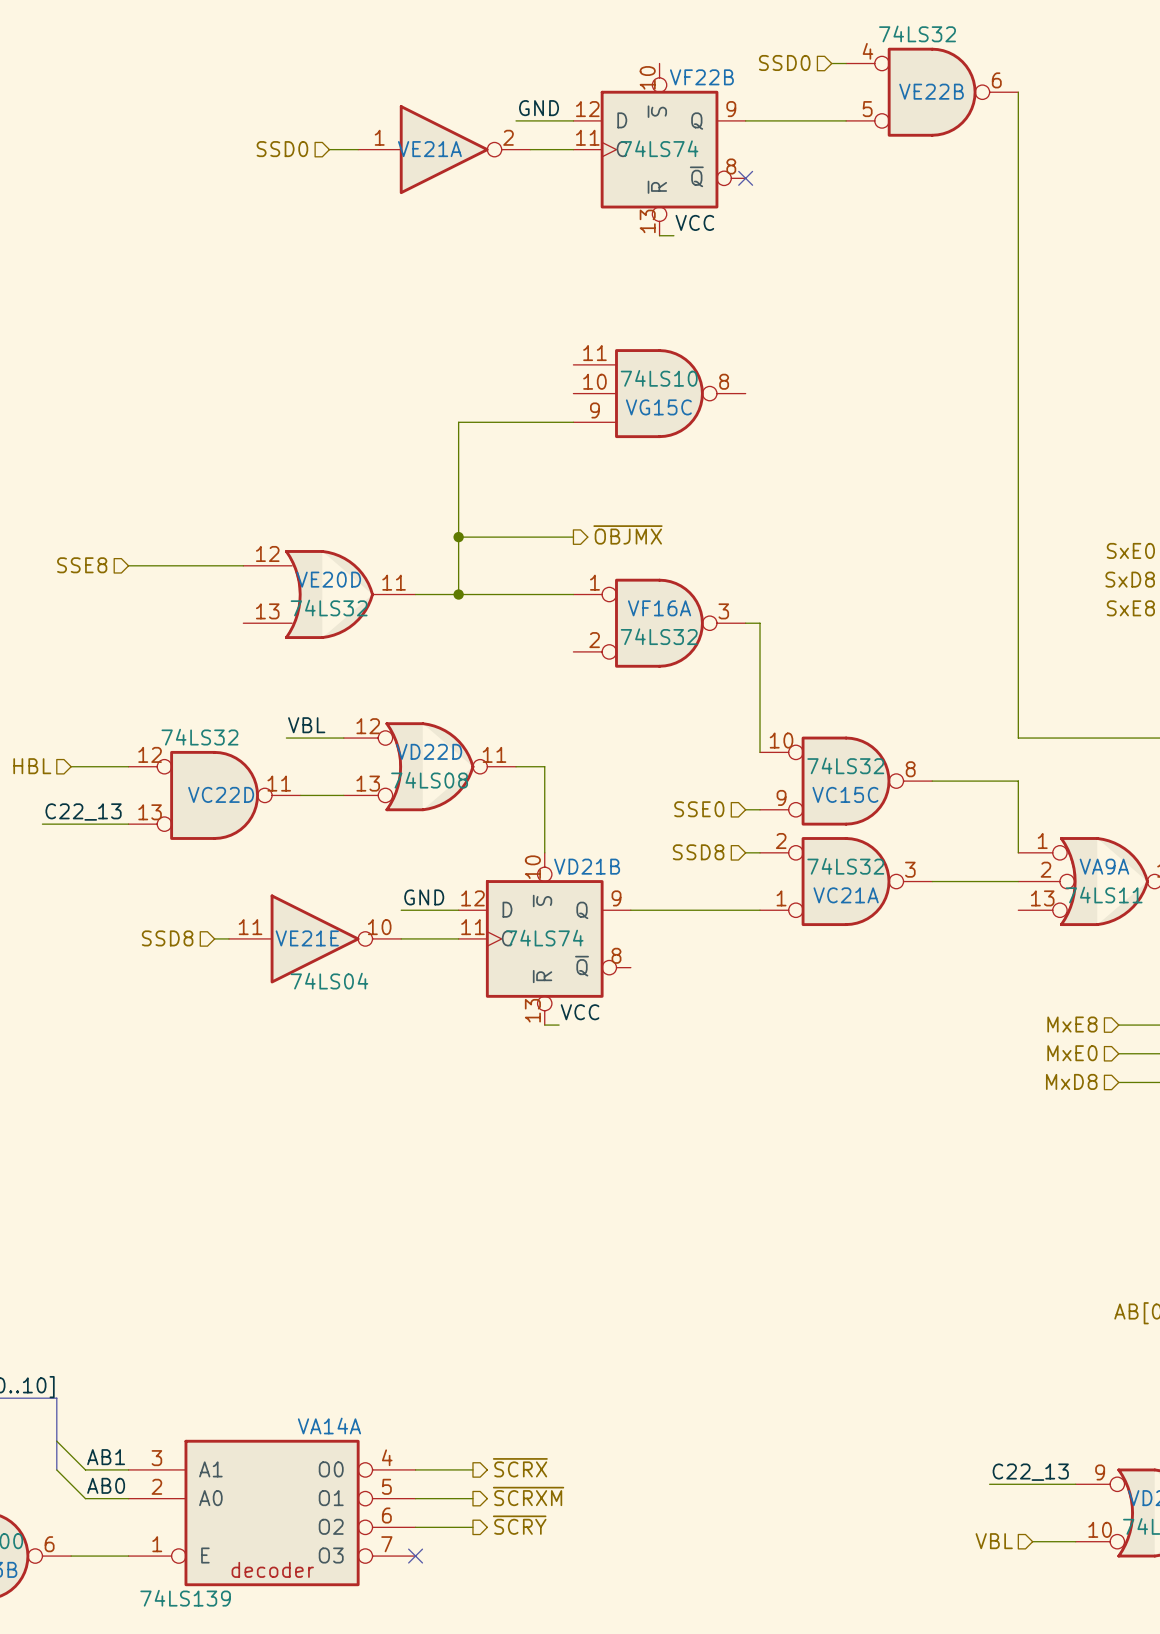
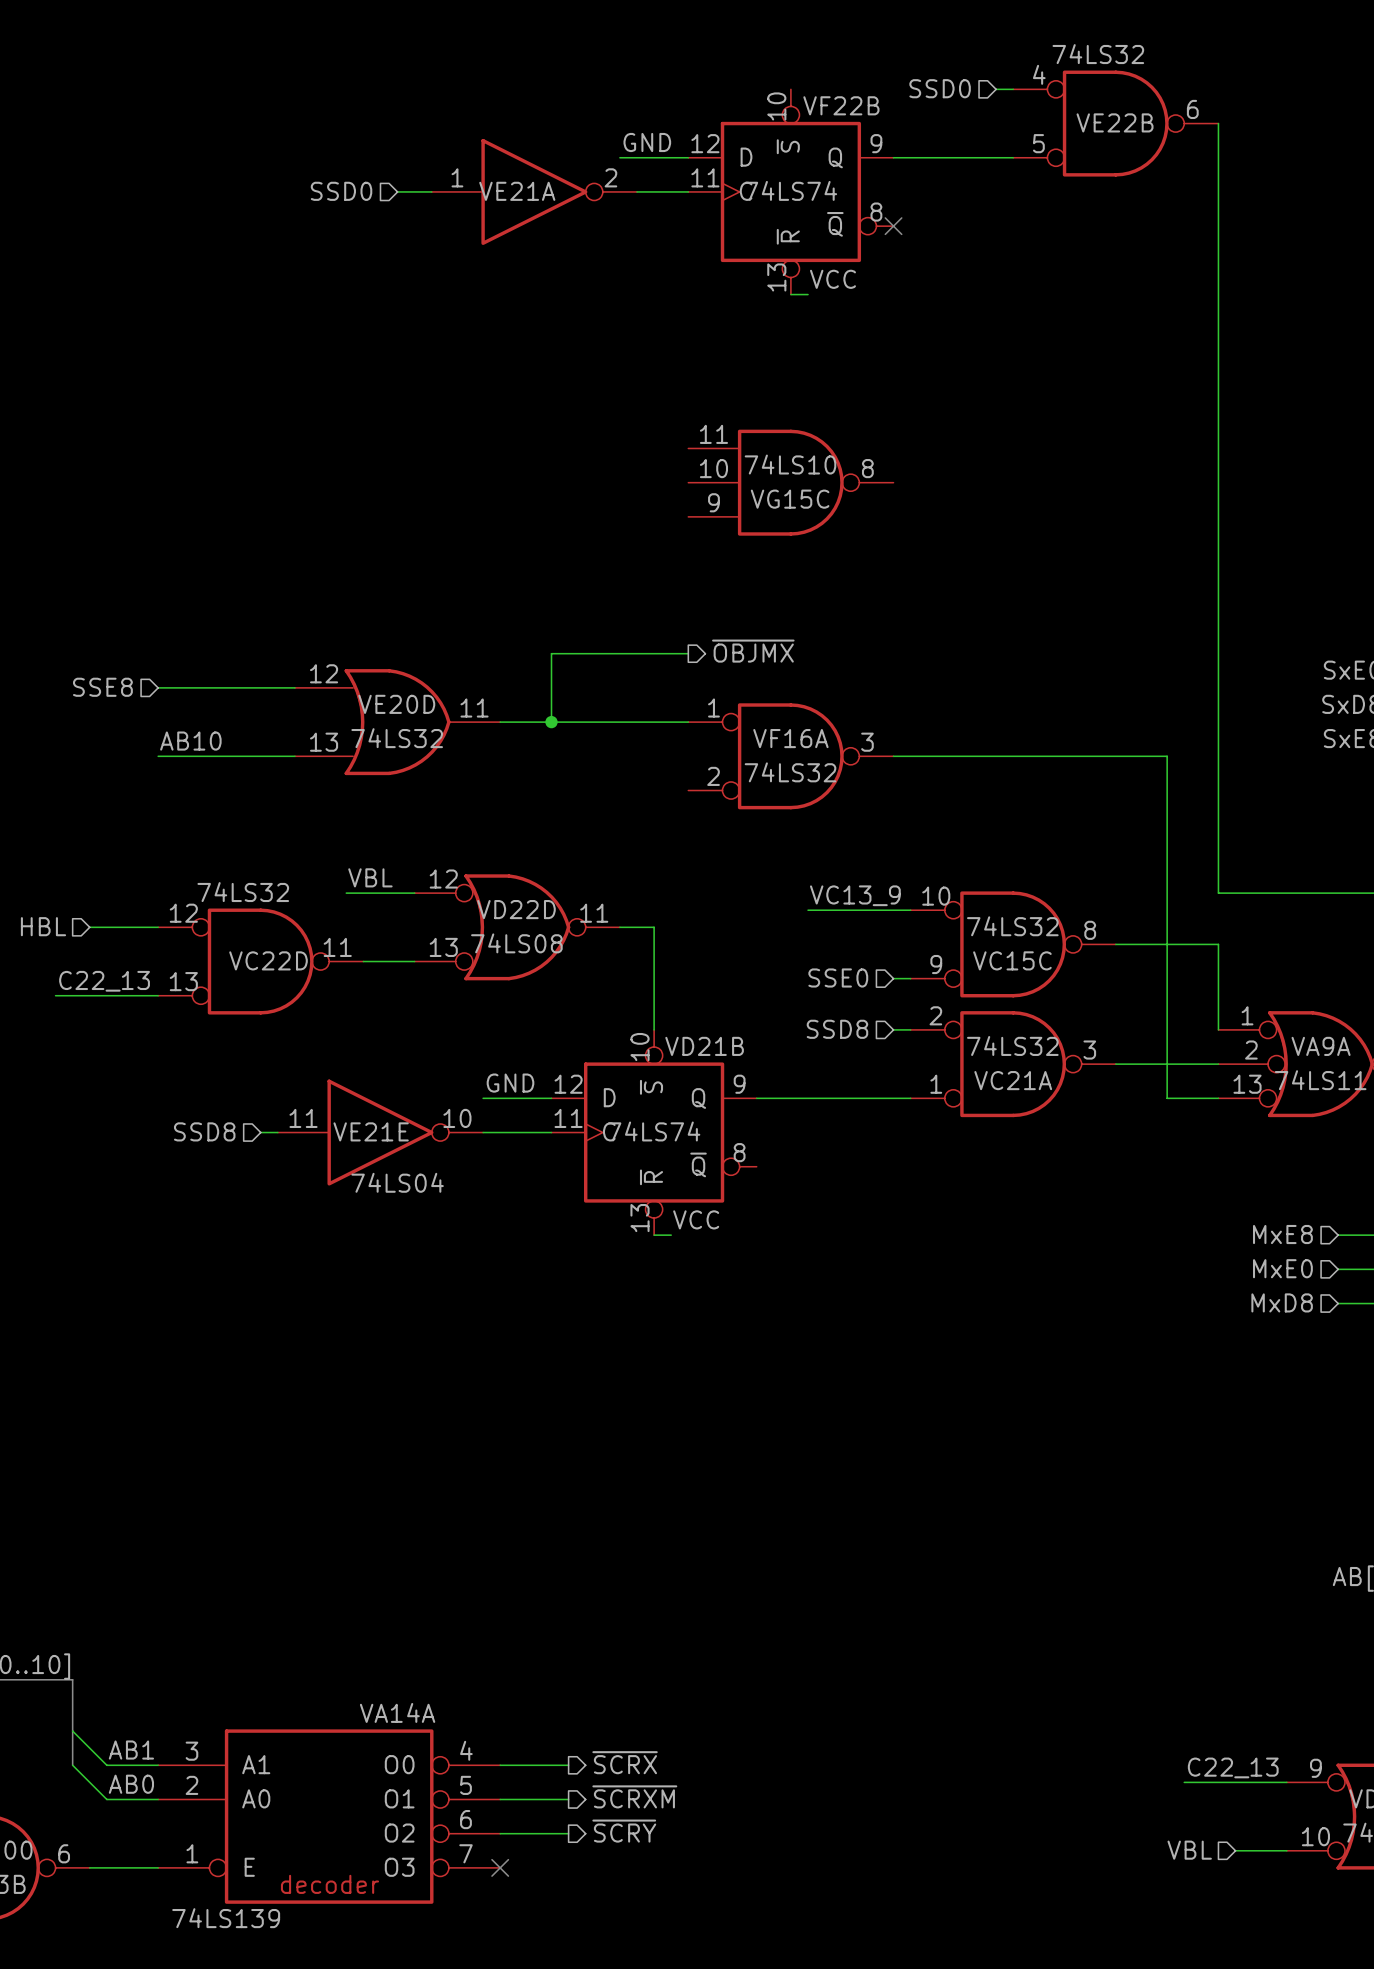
wire: (573, 422) (458, 422) (458, 537) -> none
junction: (458, 537) -> none
label: none -> AB10 (190, 741)
wire: none -> (158, 756) (294, 756)
wire: (760, 623) (760, 752) -> (808, 910) (910, 910)
wire: none -> (910, 756) (1167, 756) (1167, 1098) (1218, 1098)
label: none -> VC13_9 (855, 895)

